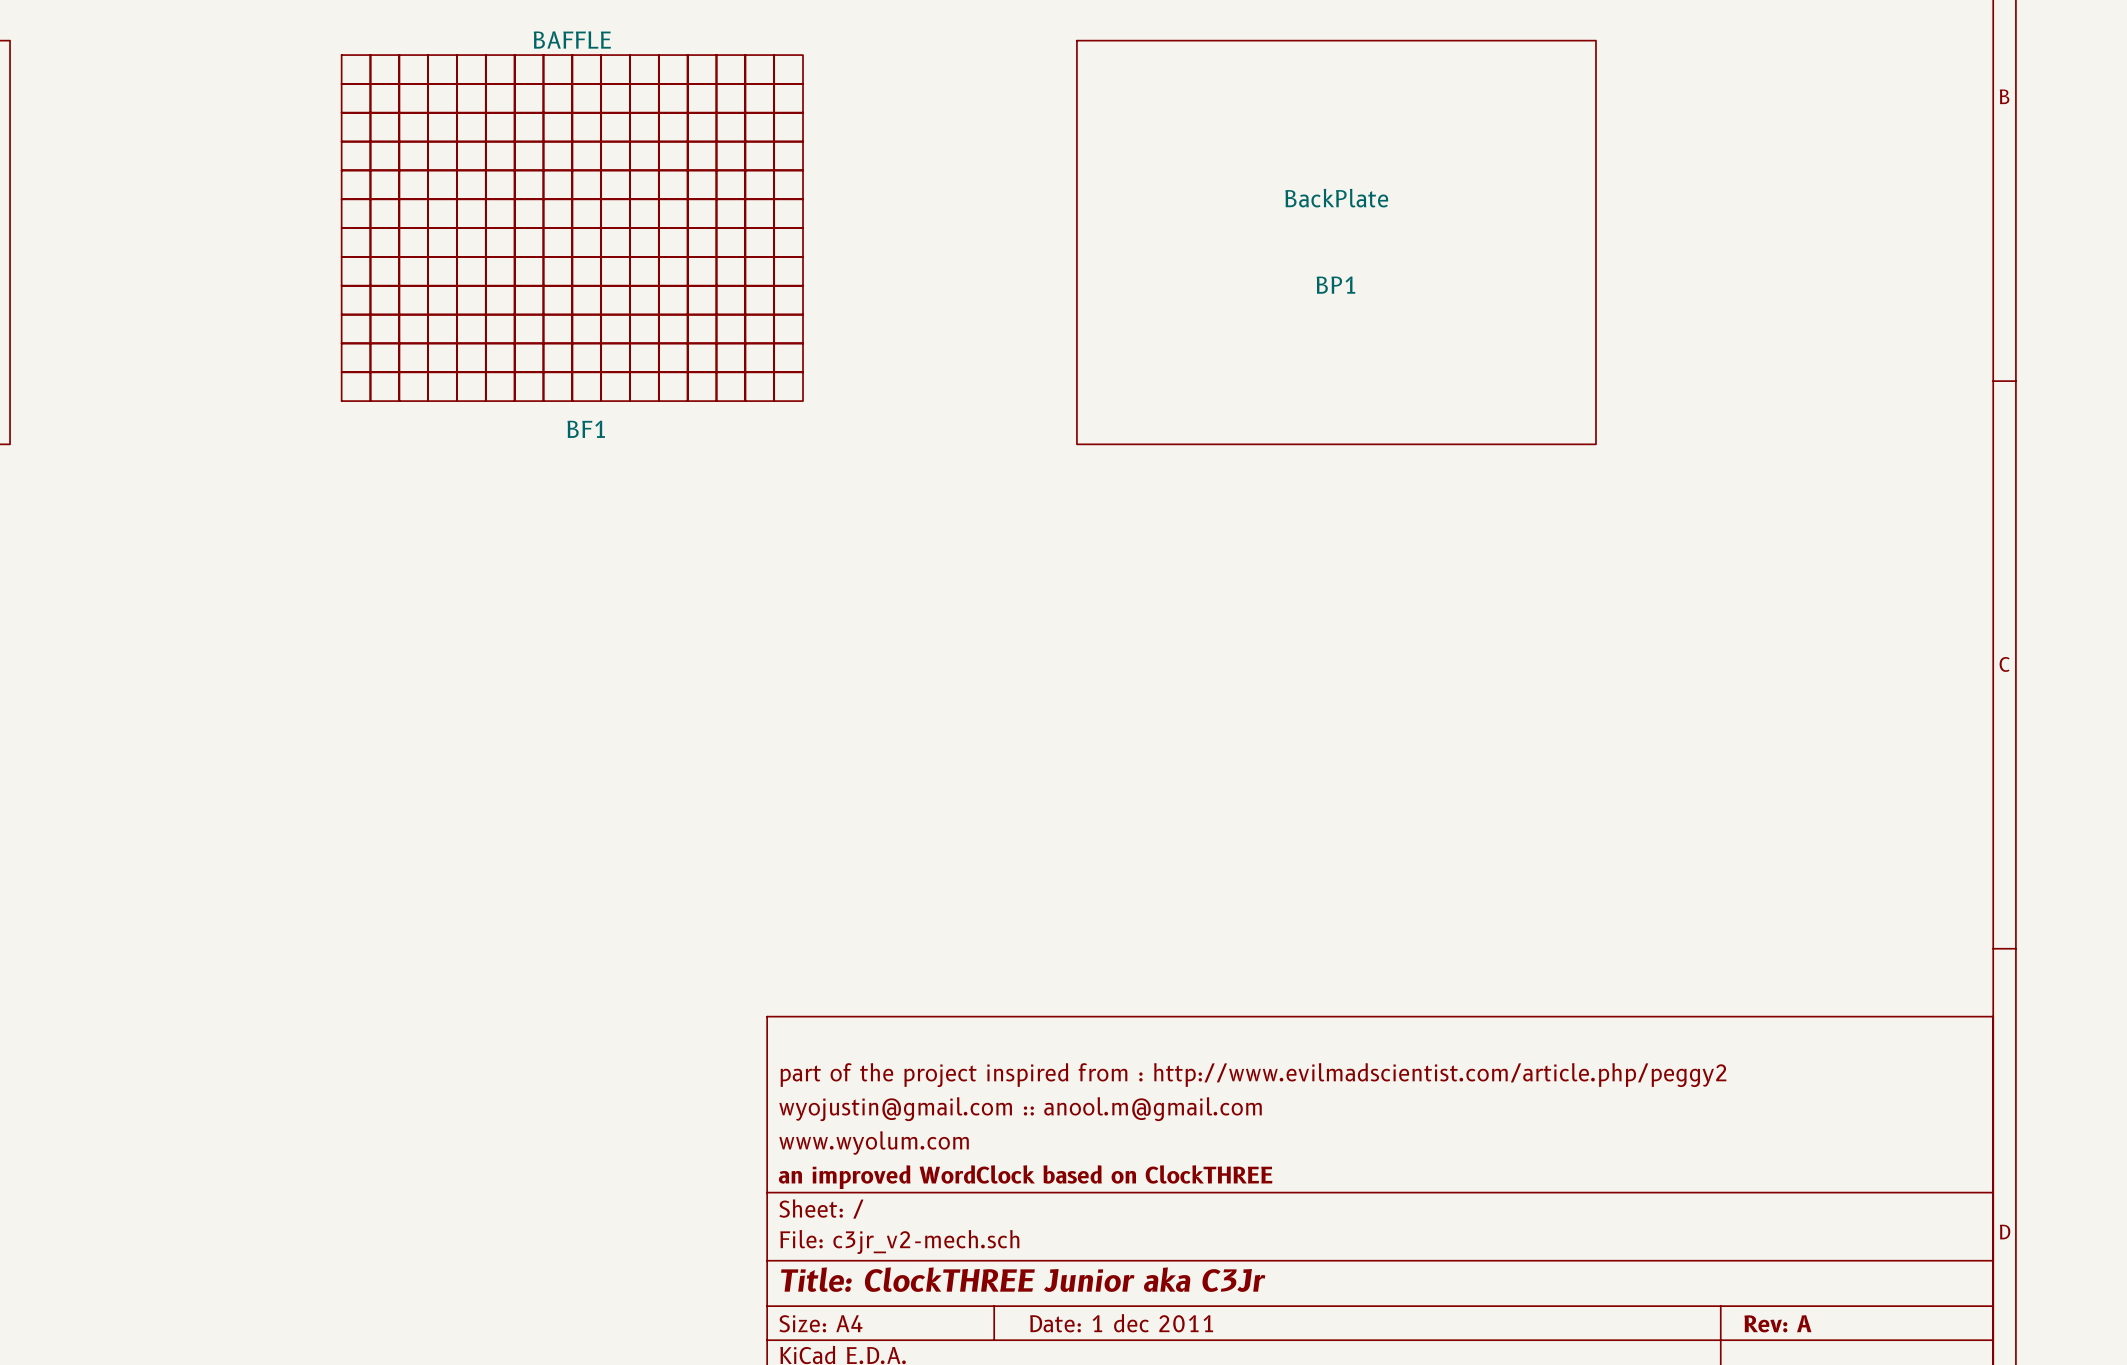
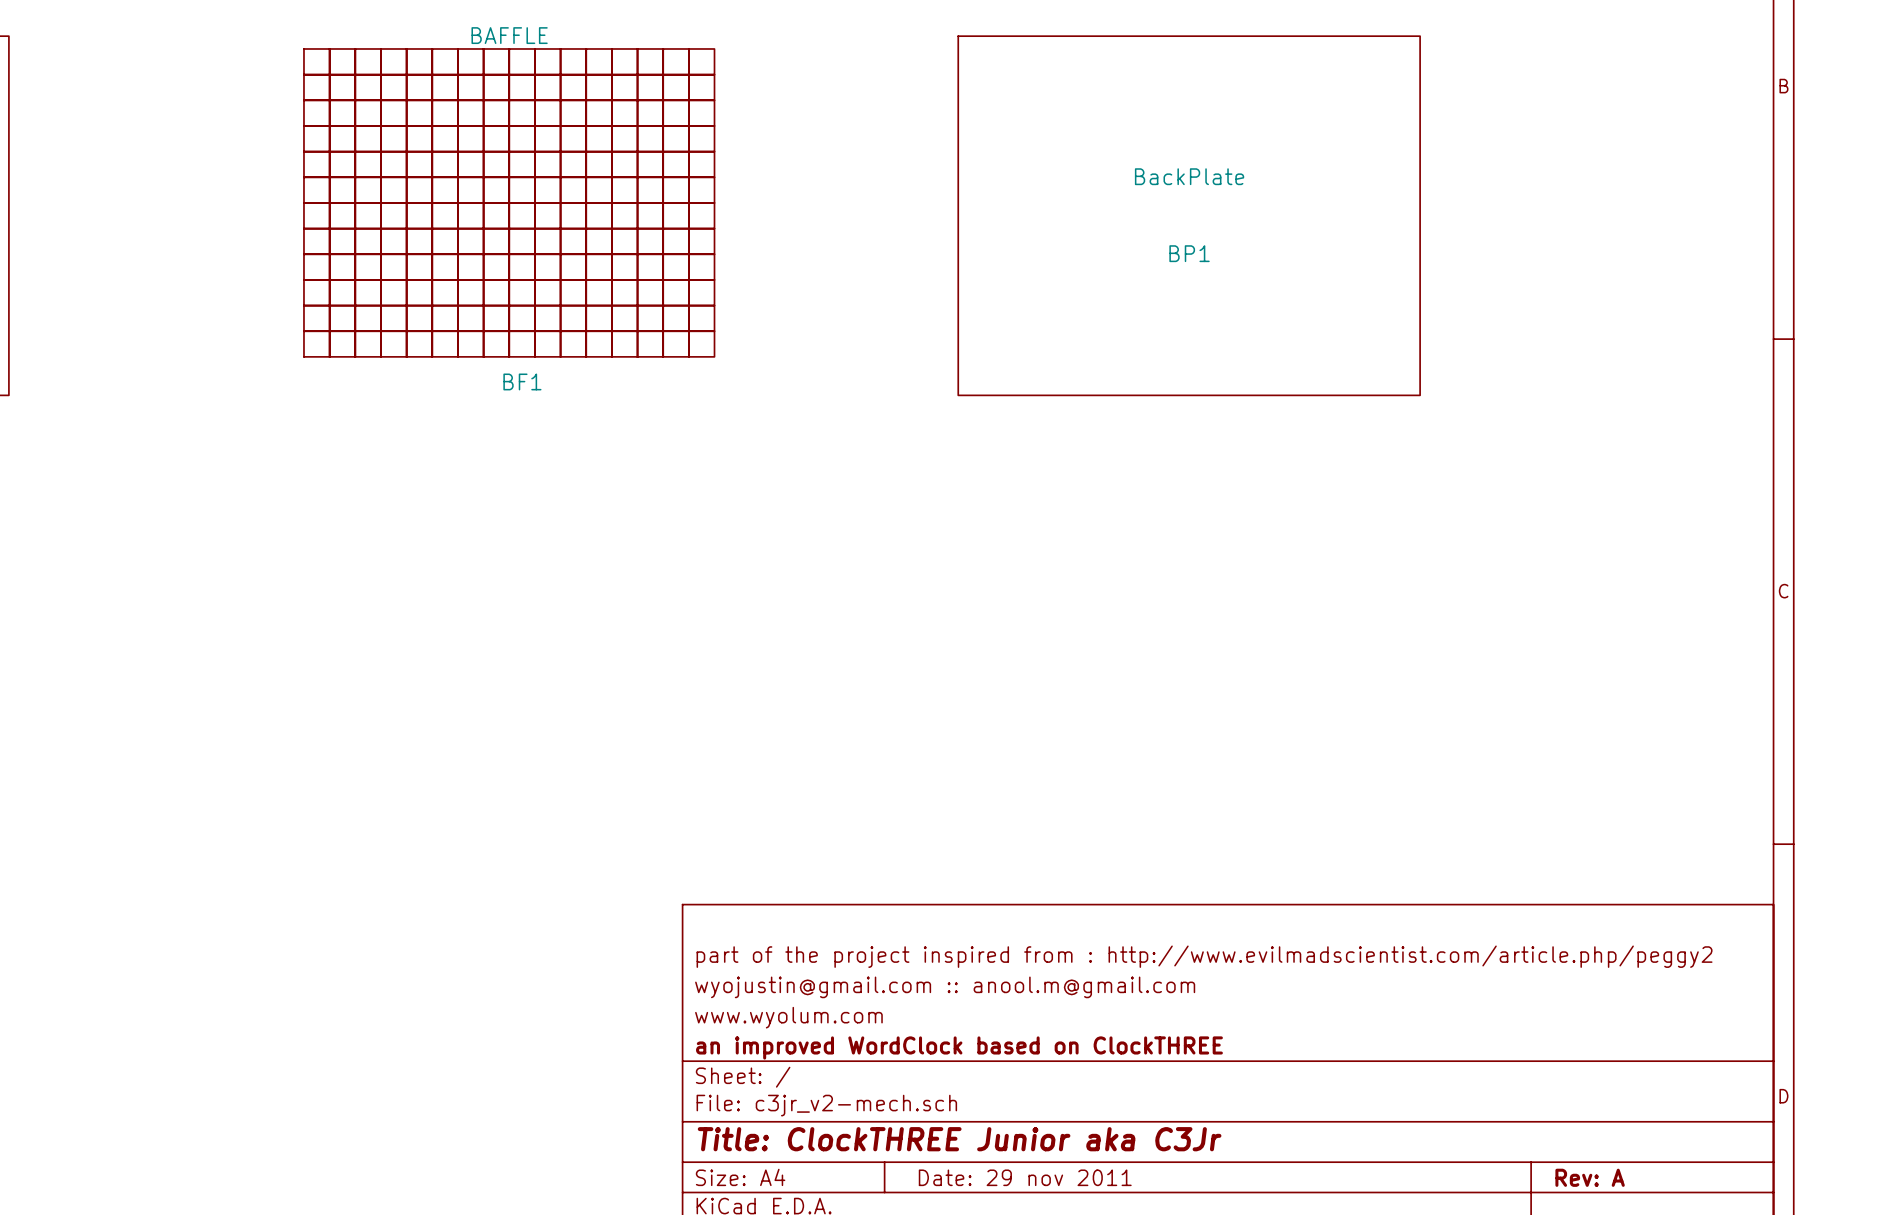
title block: Date: 1 dec 2011 (1121, 1323) -> Date: 29 nov 2011 (1025, 1177)

